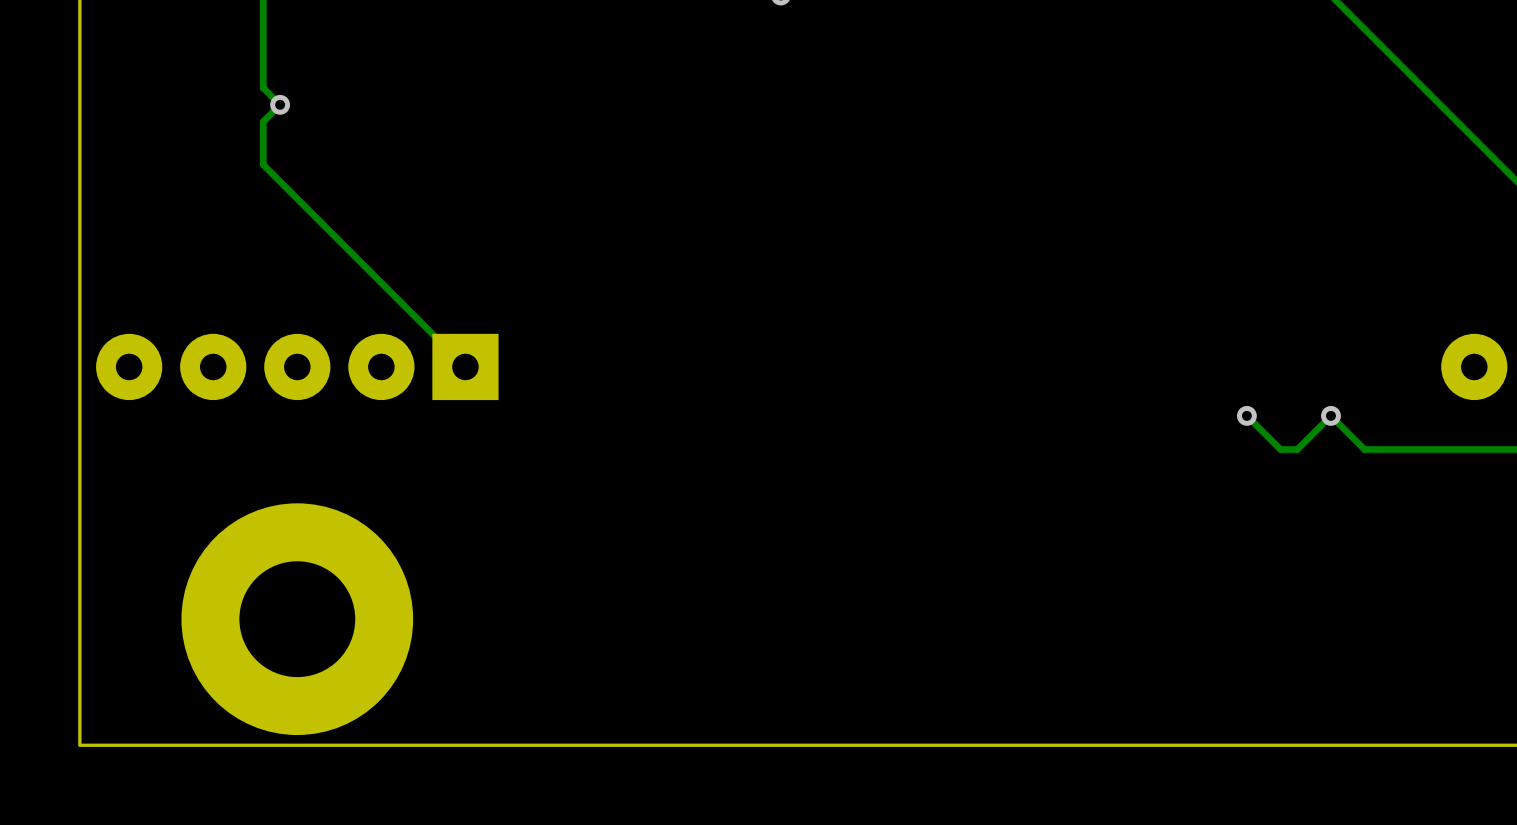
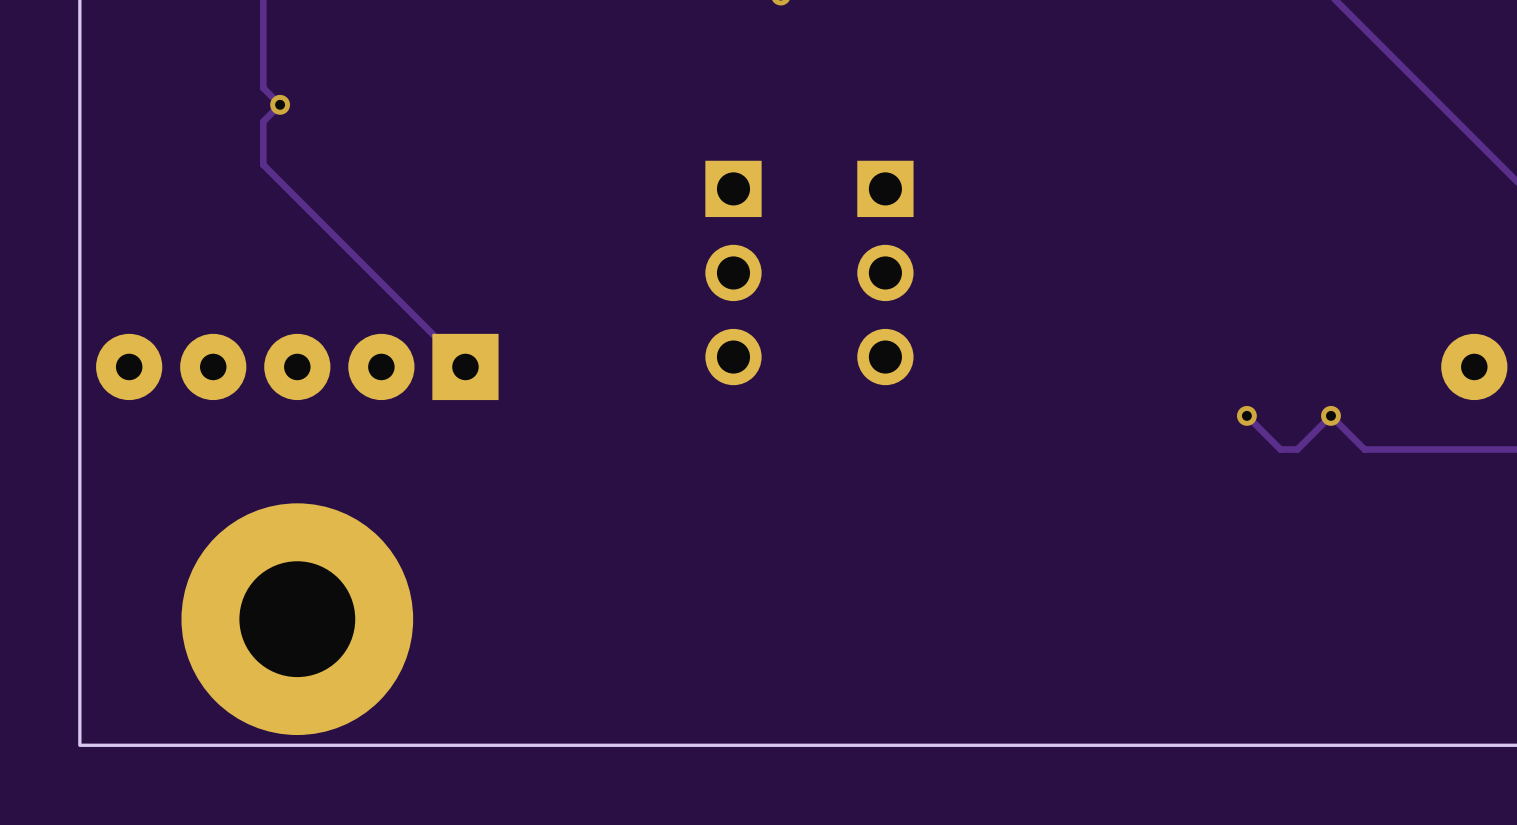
part: none -> (733, 272)
part: none -> (885, 272)

